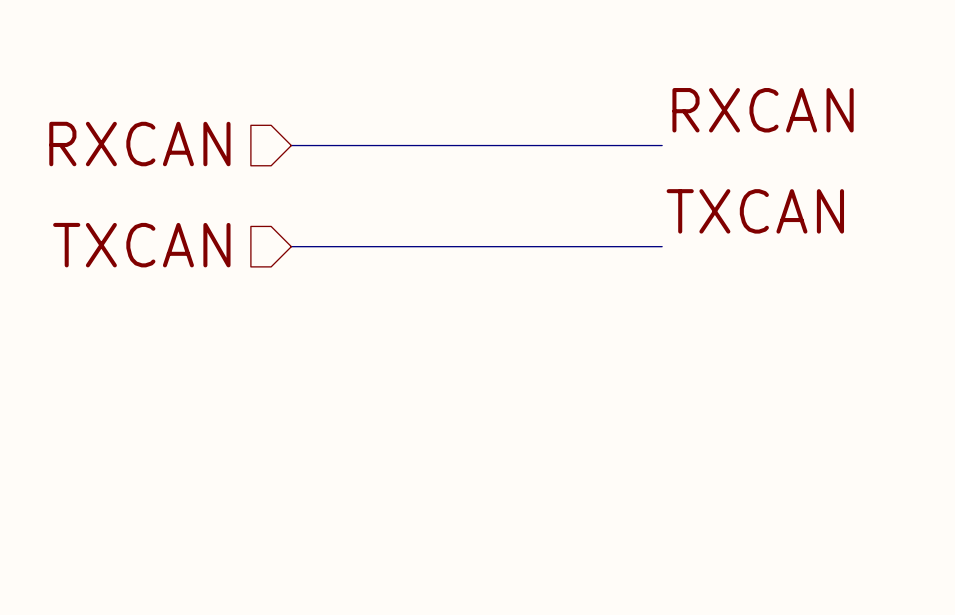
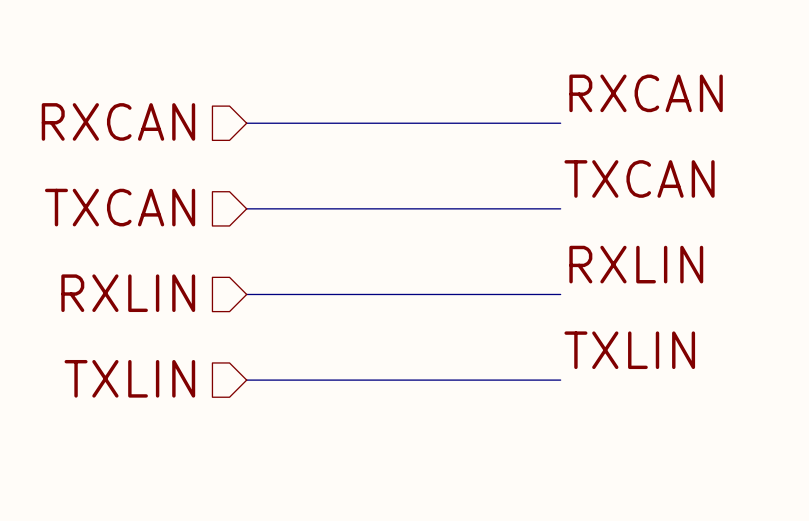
label: none -> RXLIN (636, 264)
hierarchical label: none -> RXLIN (128, 293)
wire: none -> (246, 294) (560, 294)
label: none -> TXLIN (629, 350)
hierarchical label: none -> TXLIN (129, 378)
wire: none -> (246, 380) (560, 380)

